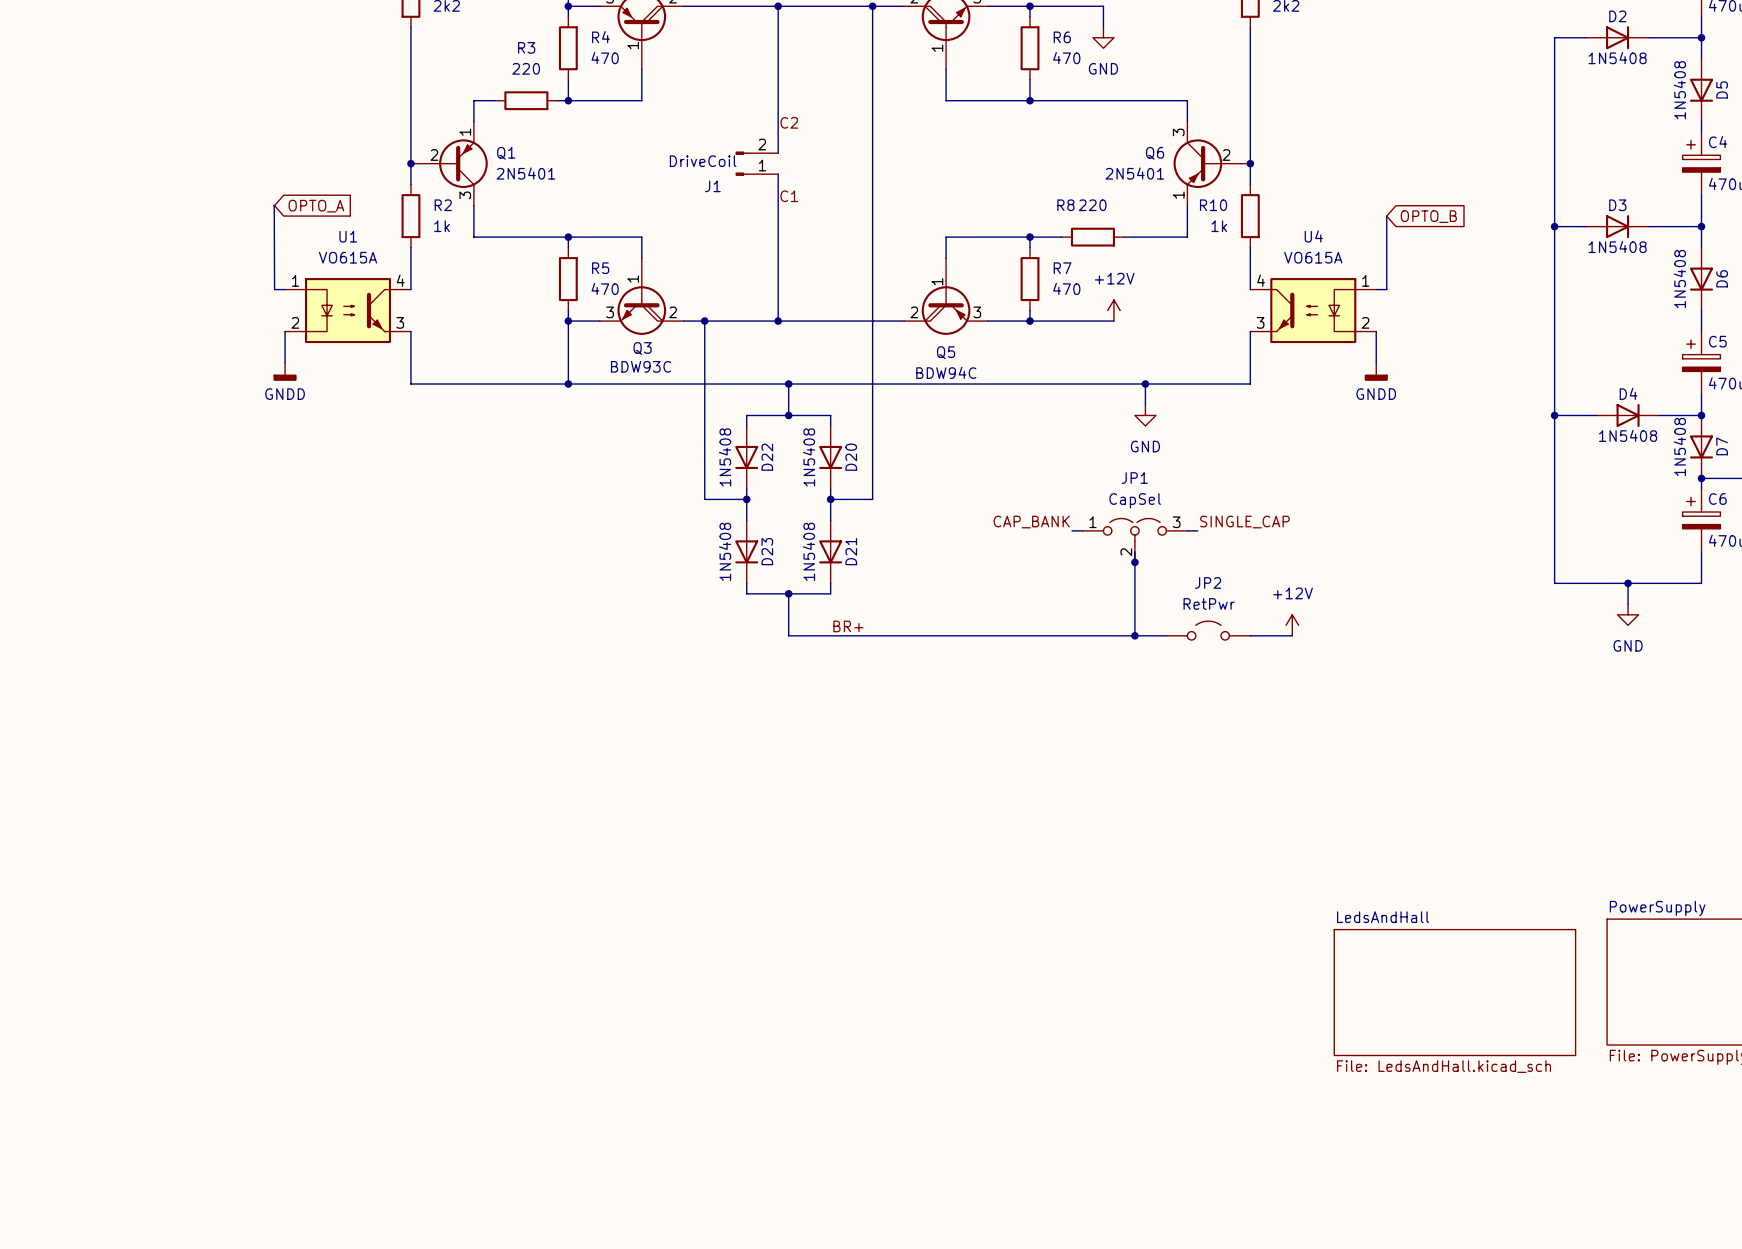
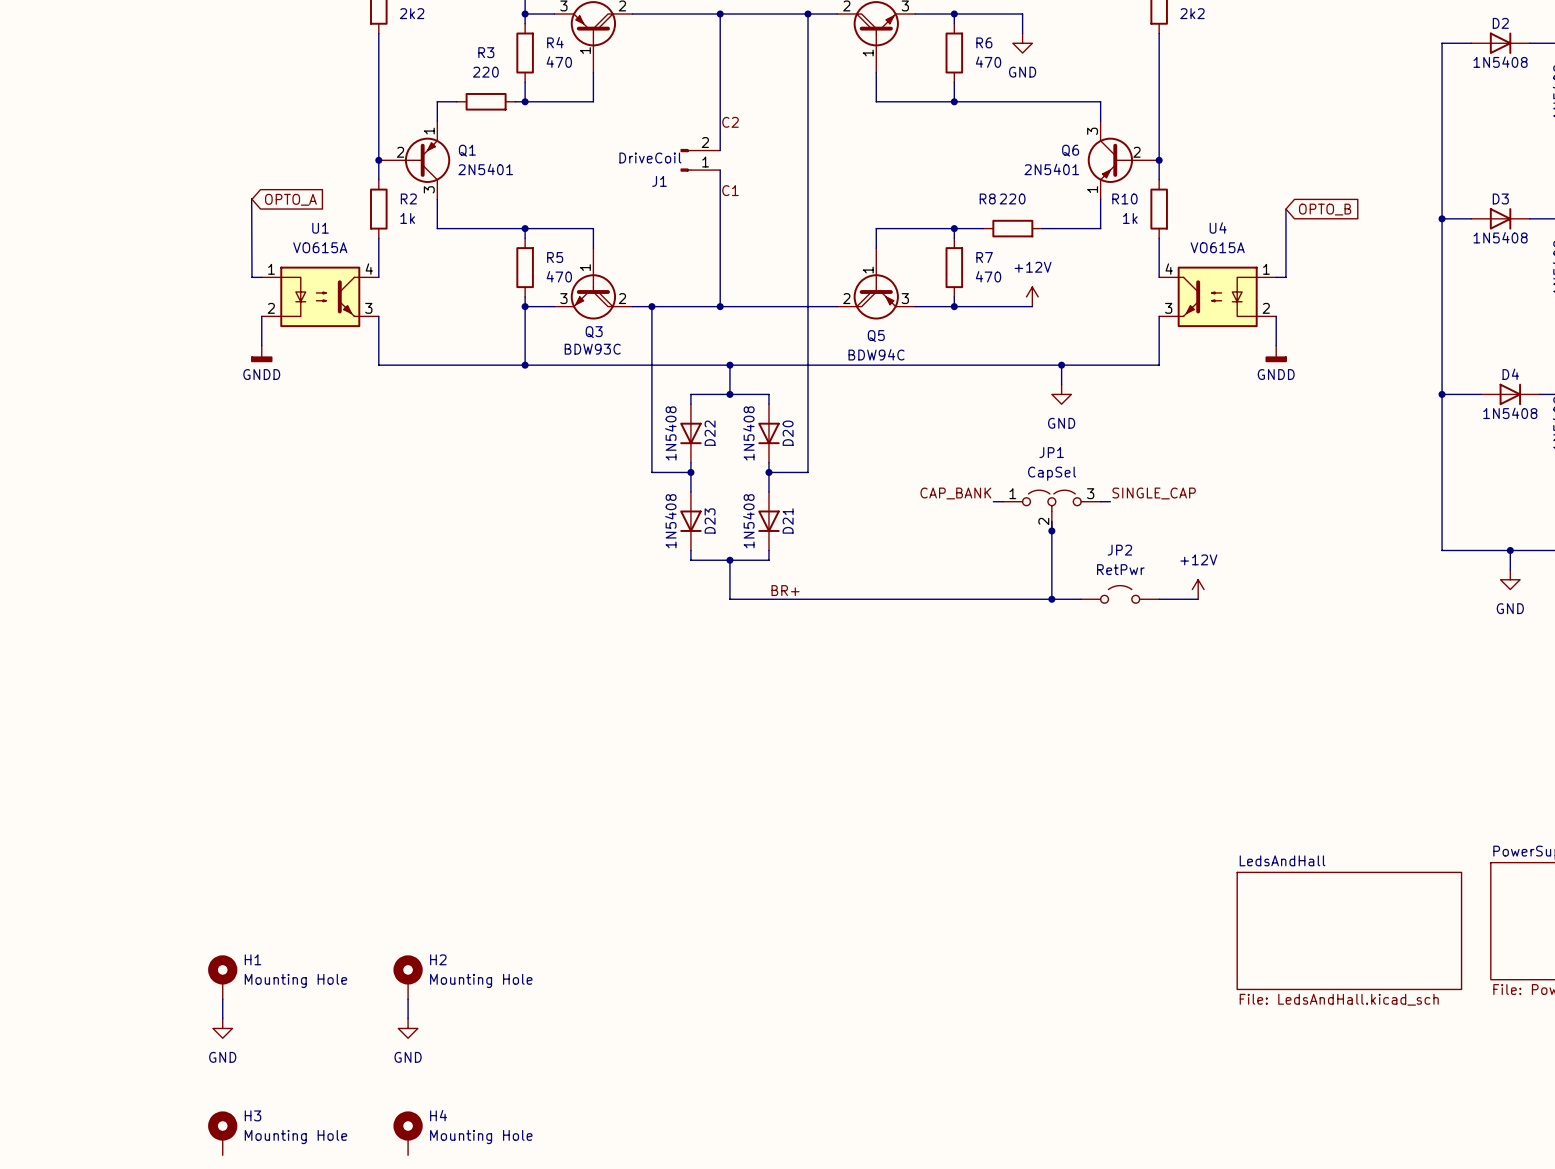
H1: none -> Mounting Hole (222, 977)
H2: none -> Mounting Hole (408, 977)
wire: none -> (222, 999) (222, 1018)
wire: none -> (408, 999) (408, 1018)
power symbol: none -> GND (222, 1028)
power symbol: none -> GND (408, 1028)
H3: none -> Mounting Hole (222, 1133)
H4: none -> Mounting Hole (408, 1133)

